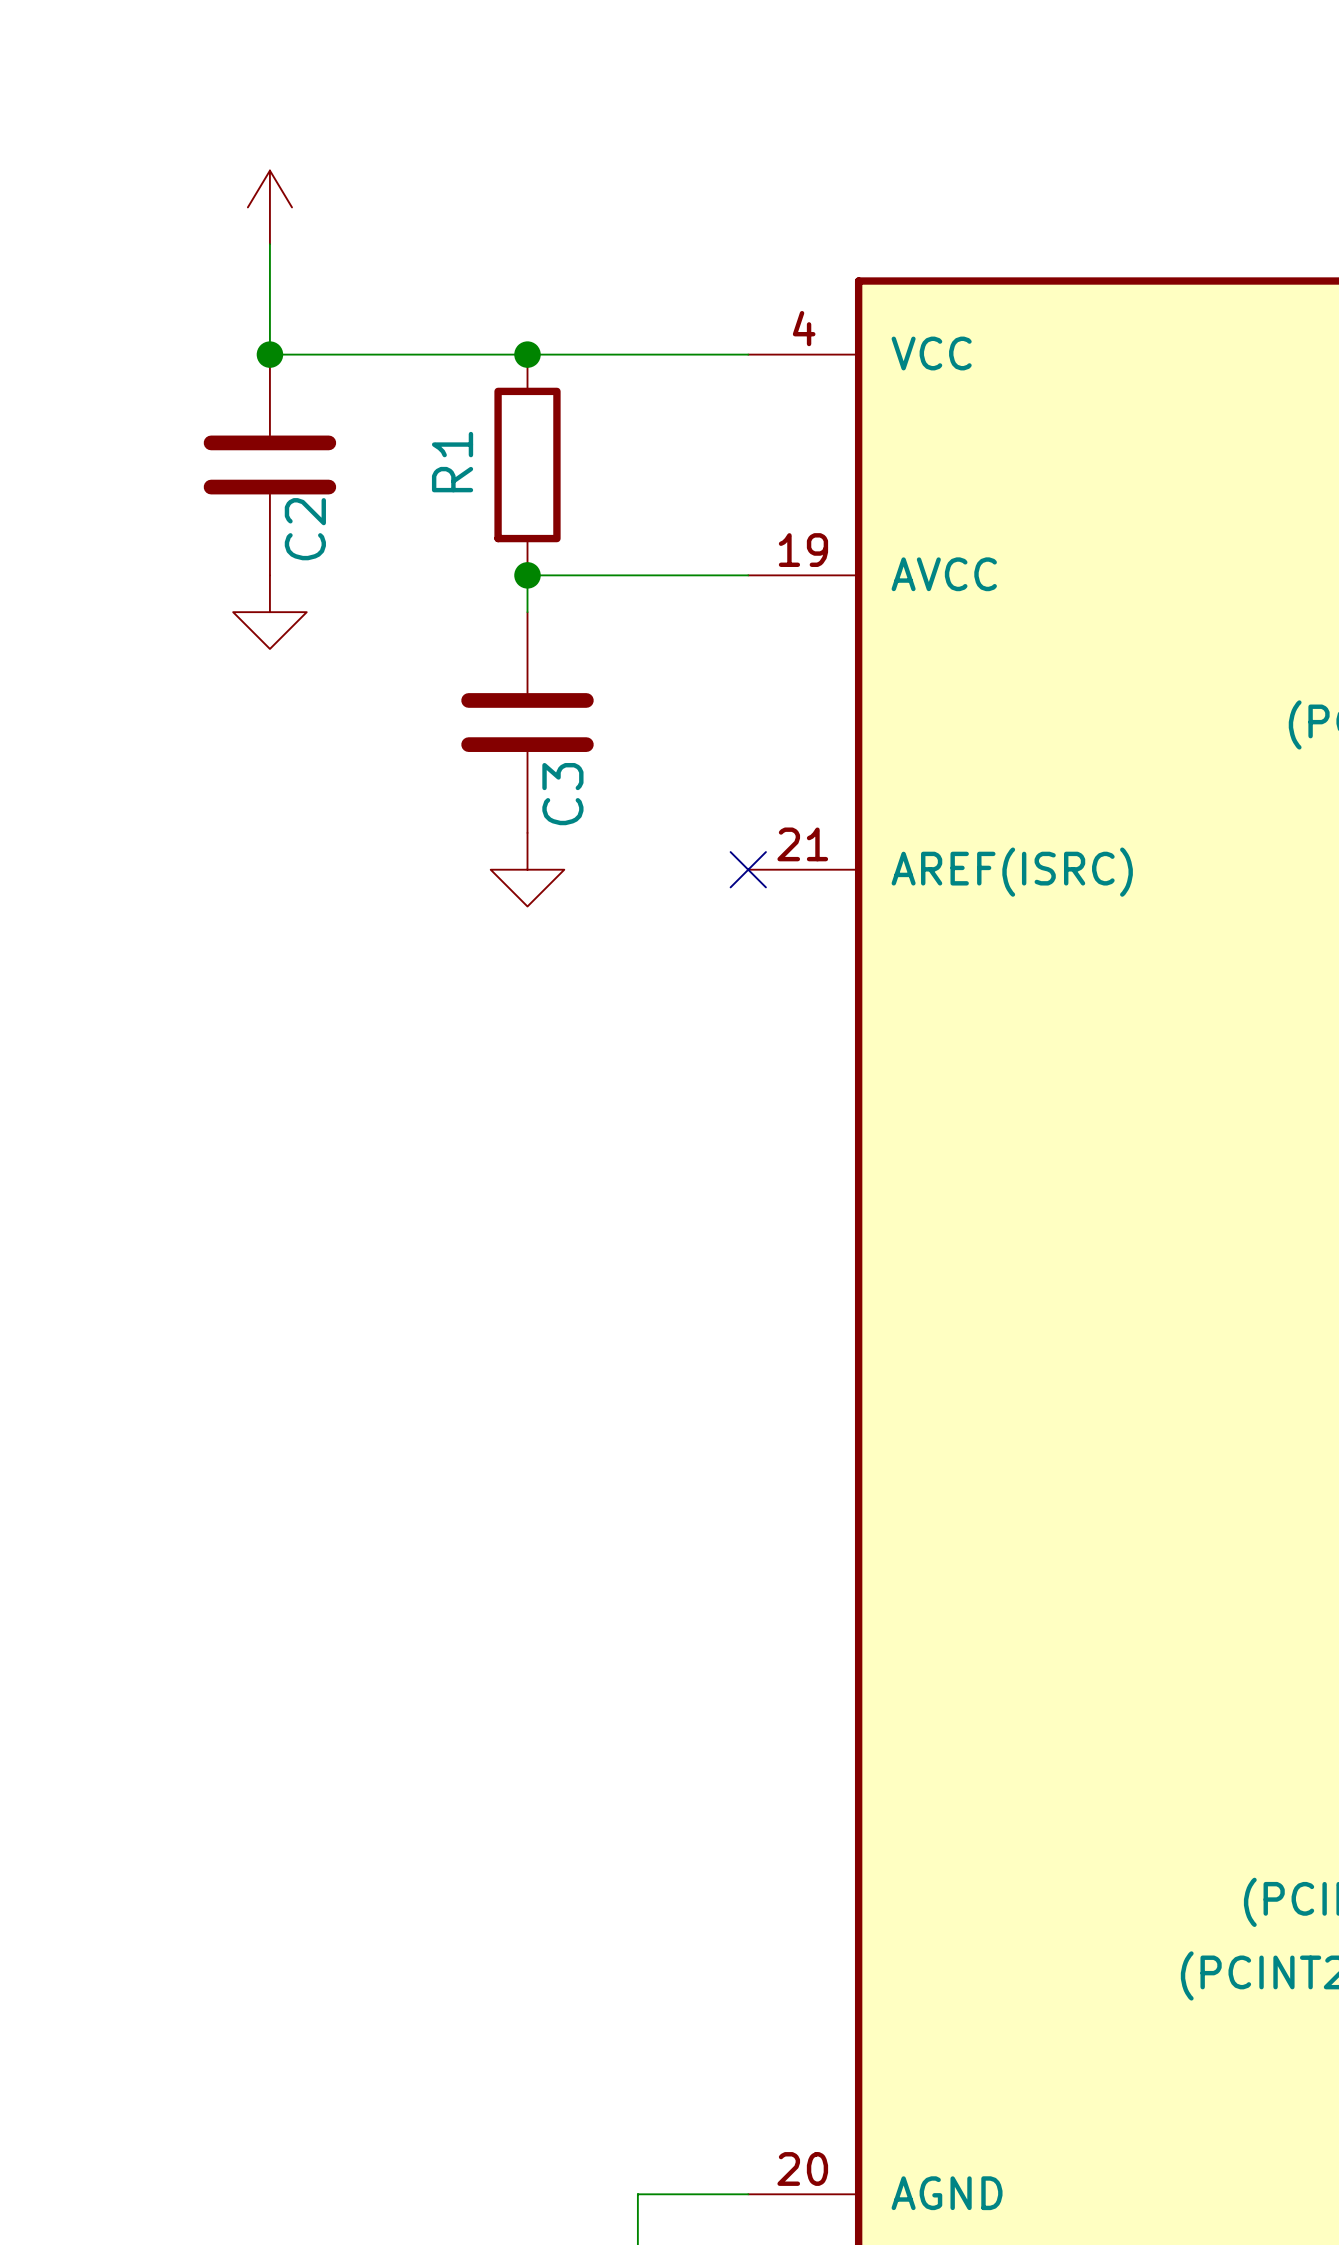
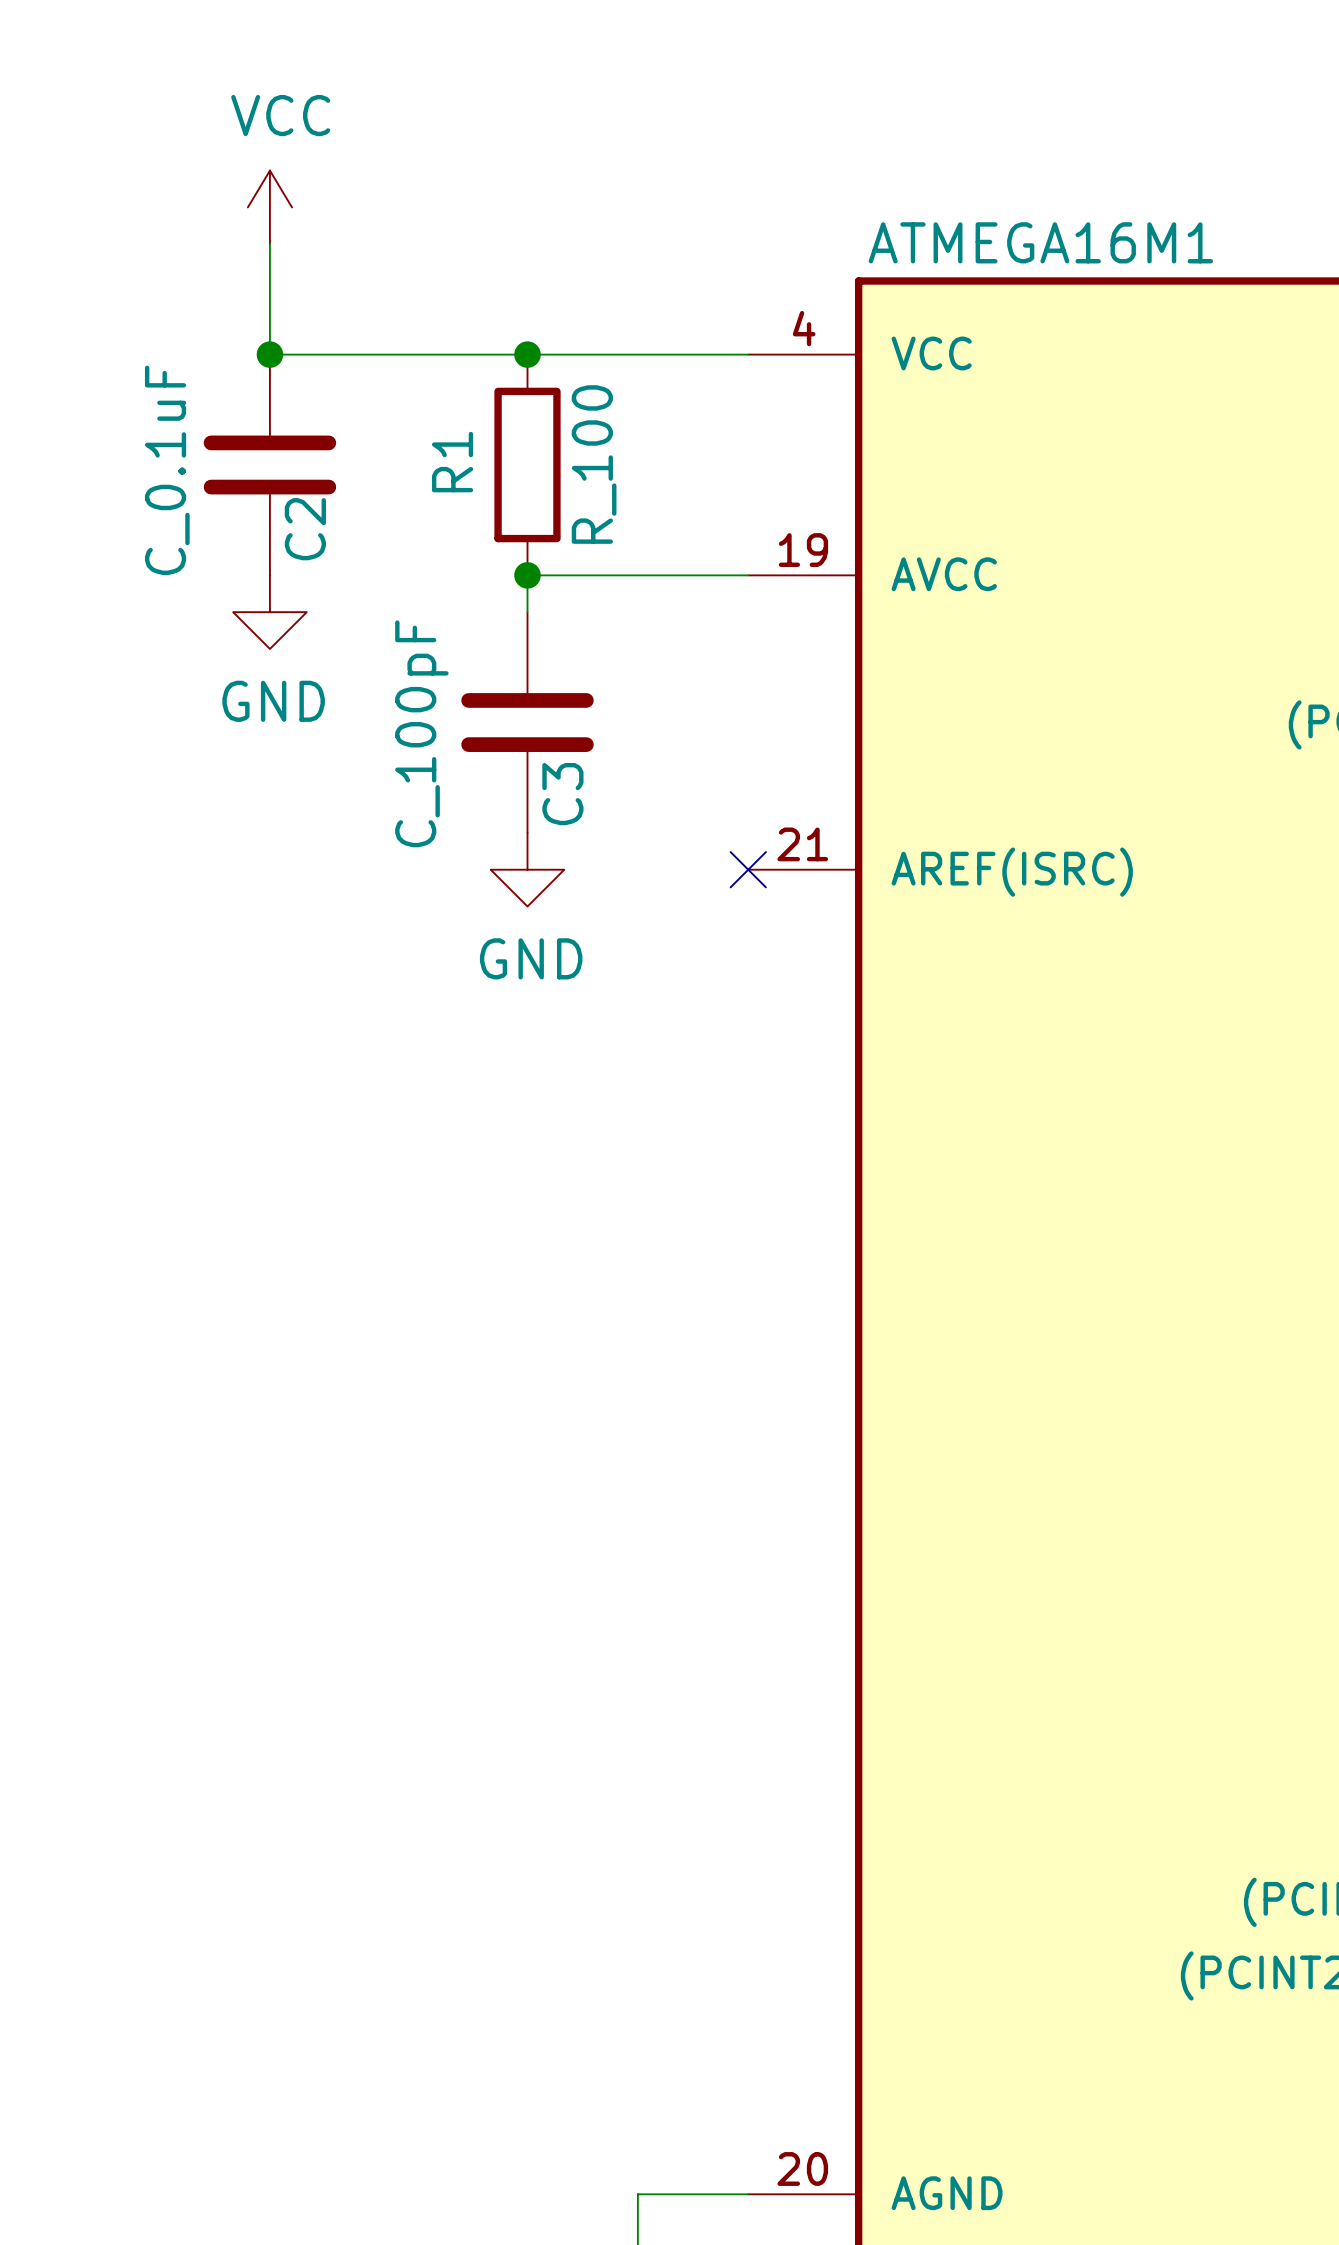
power symbol text: none -> VCC (280, 115)
part value: none -> ATMEGA16M1 (1040, 242)
R1 value: none -> R_100 (594, 464)
C2 value: none -> C_0.1uF (167, 470)
power symbol text: none -> GND (273, 701)
C3 value: none -> C_100pF (421, 733)
power symbol text: none -> GND (531, 958)

